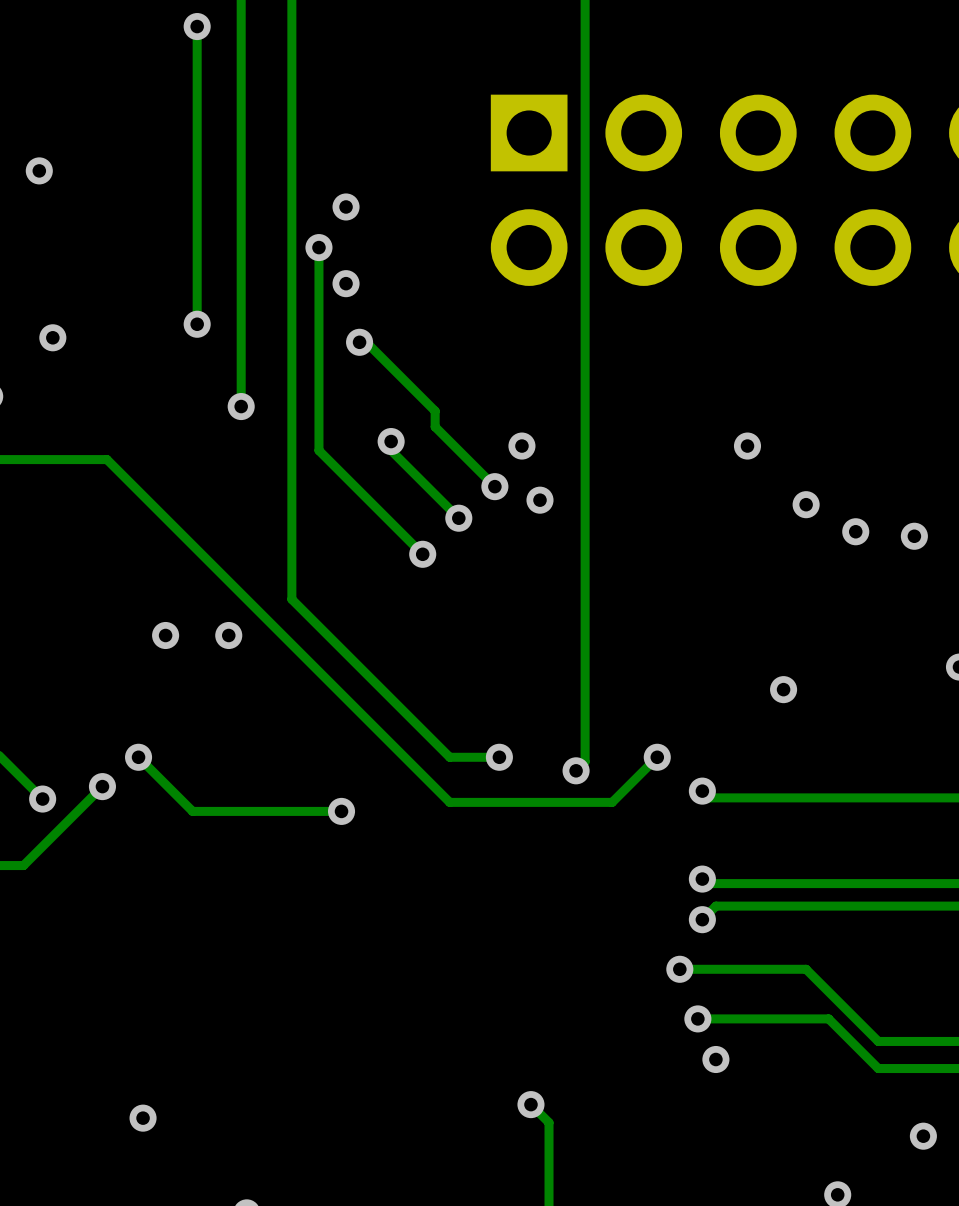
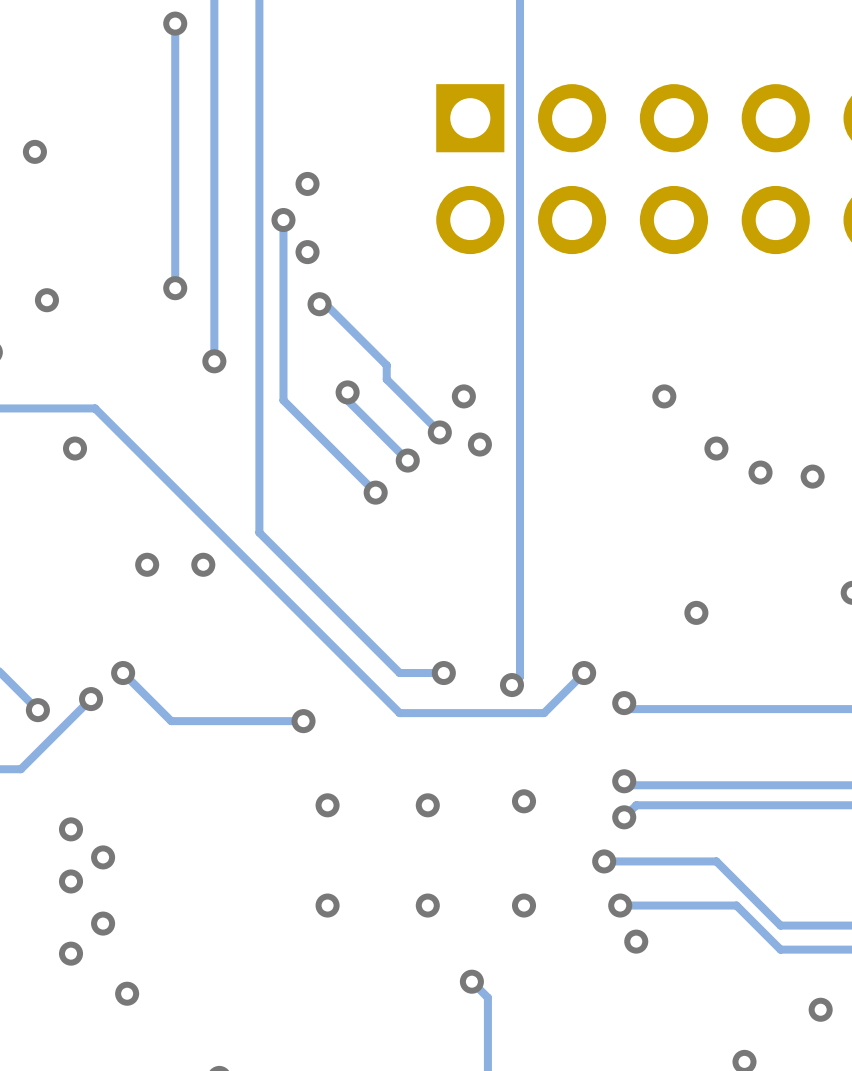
via: none -> (75, 448)
via: none -> (524, 801)
via: none -> (327, 805)
via: none -> (427, 805)
via: none -> (71, 829)
via: none -> (103, 857)
via: none -> (71, 881)
via: none -> (327, 905)
via: none -> (427, 905)
via: none -> (524, 905)
via: none -> (103, 923)
via: none -> (71, 953)

